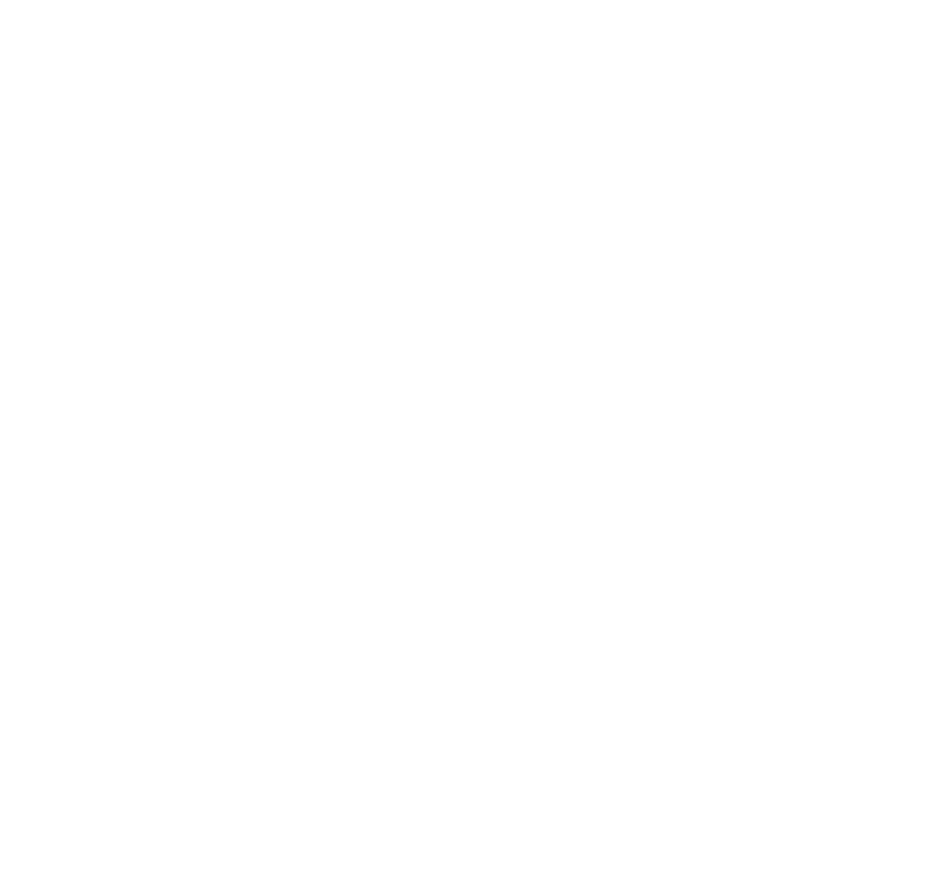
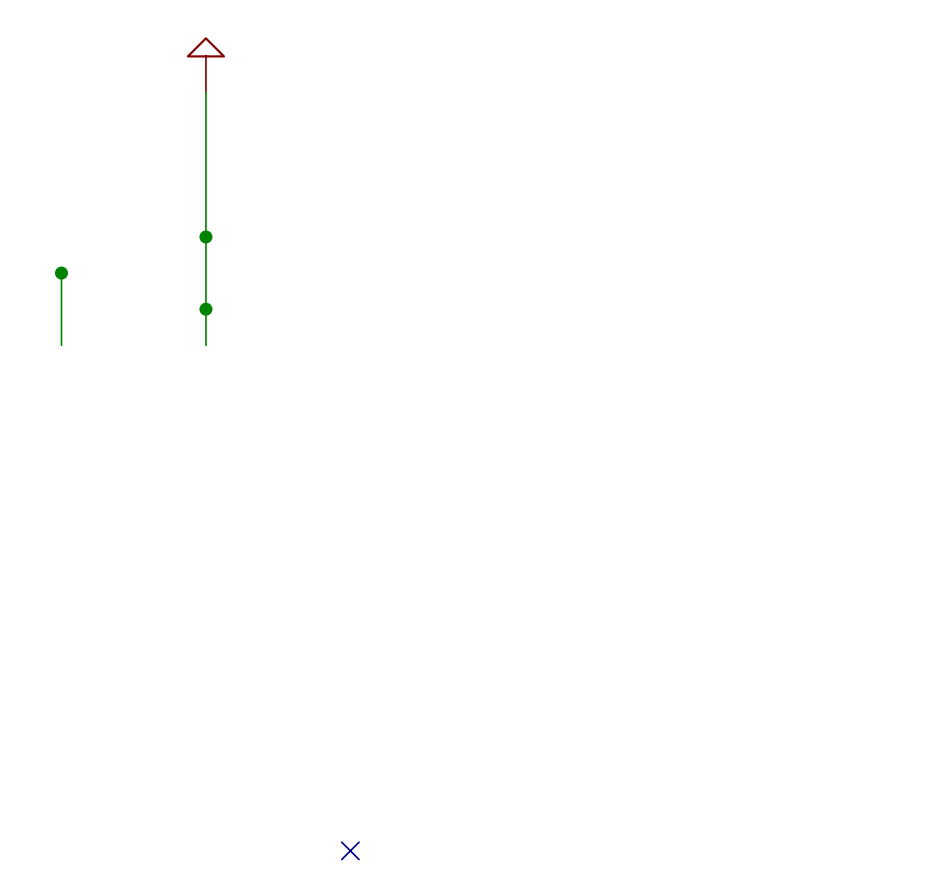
power symbol: none -> (205, 64)
wire: none -> (205, 92) (205, 345)
junction: none -> (205, 236)
wire: none -> (61, 273) (61, 345)
junction: none -> (61, 273)
junction: none -> (205, 309)
no-connect mark: none -> (350, 850)

